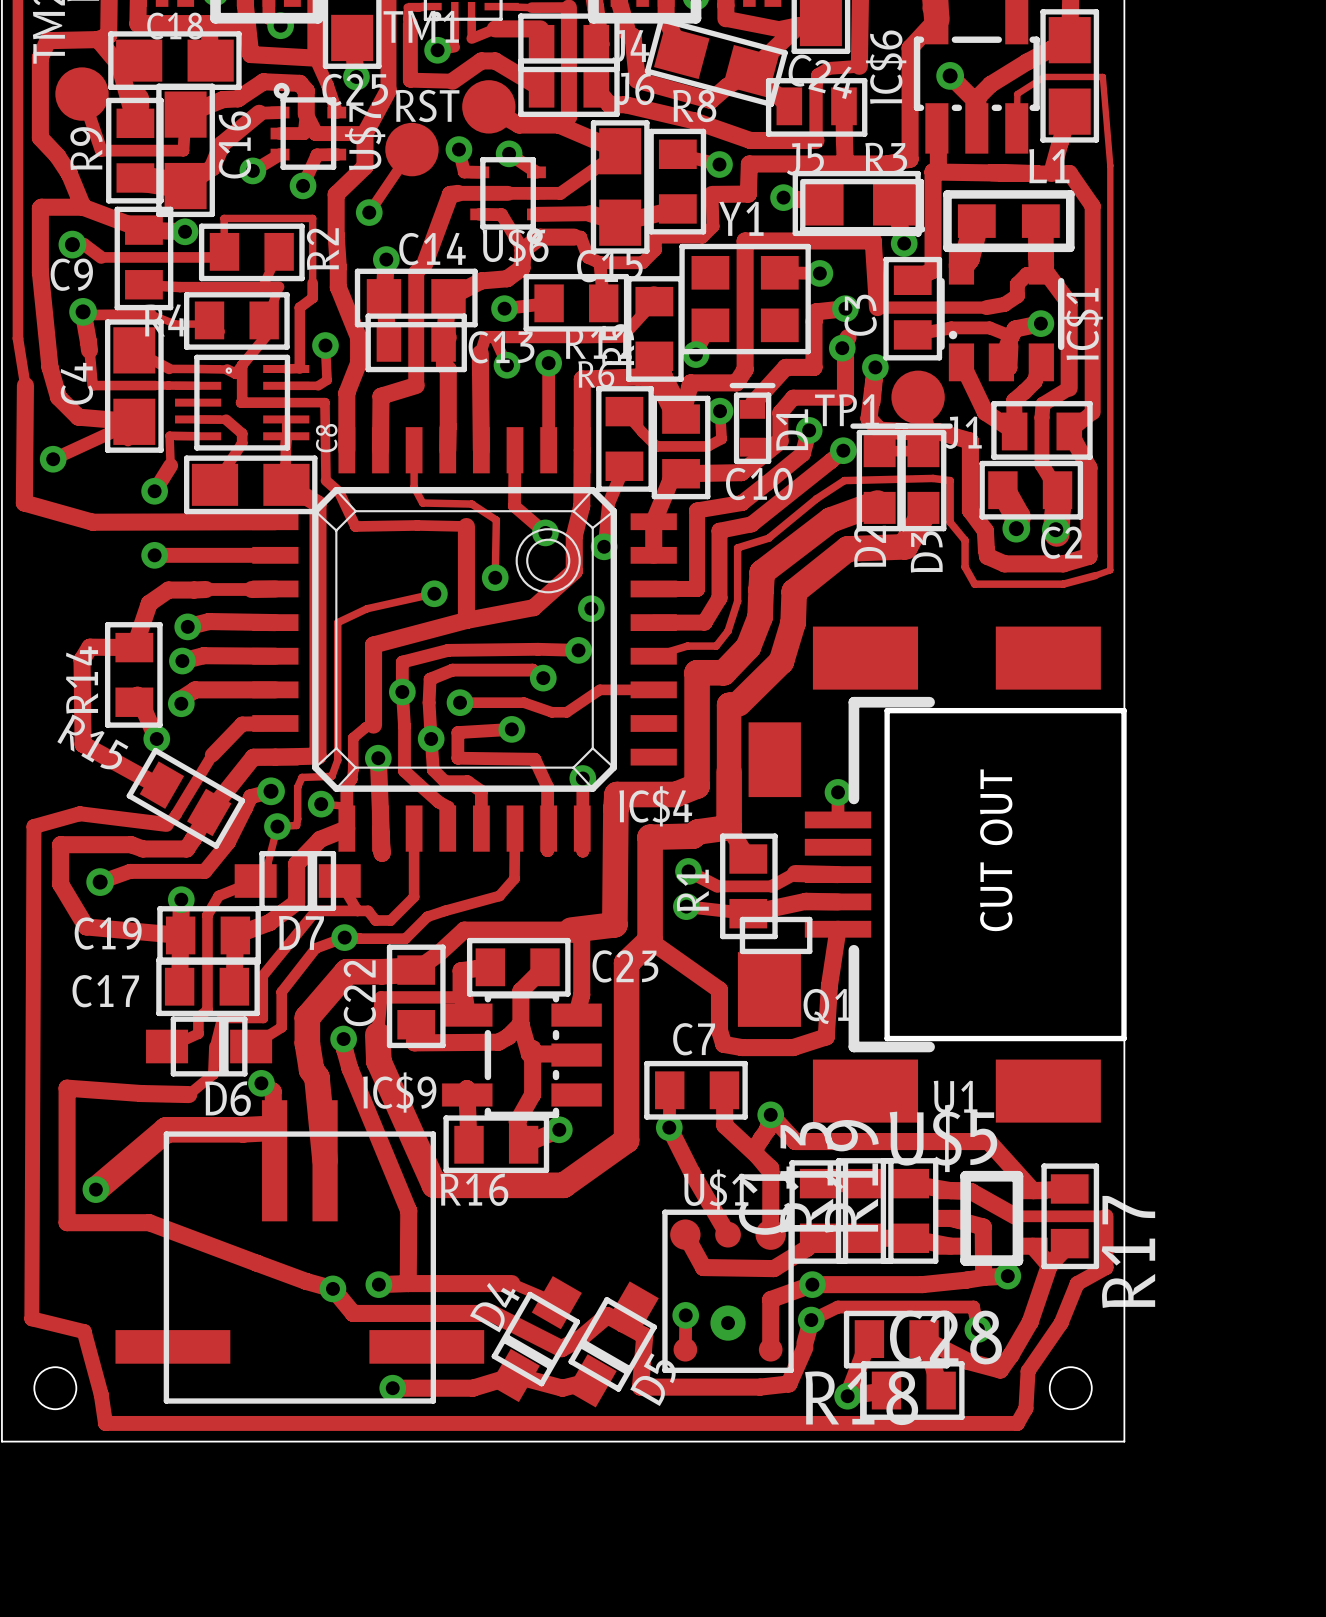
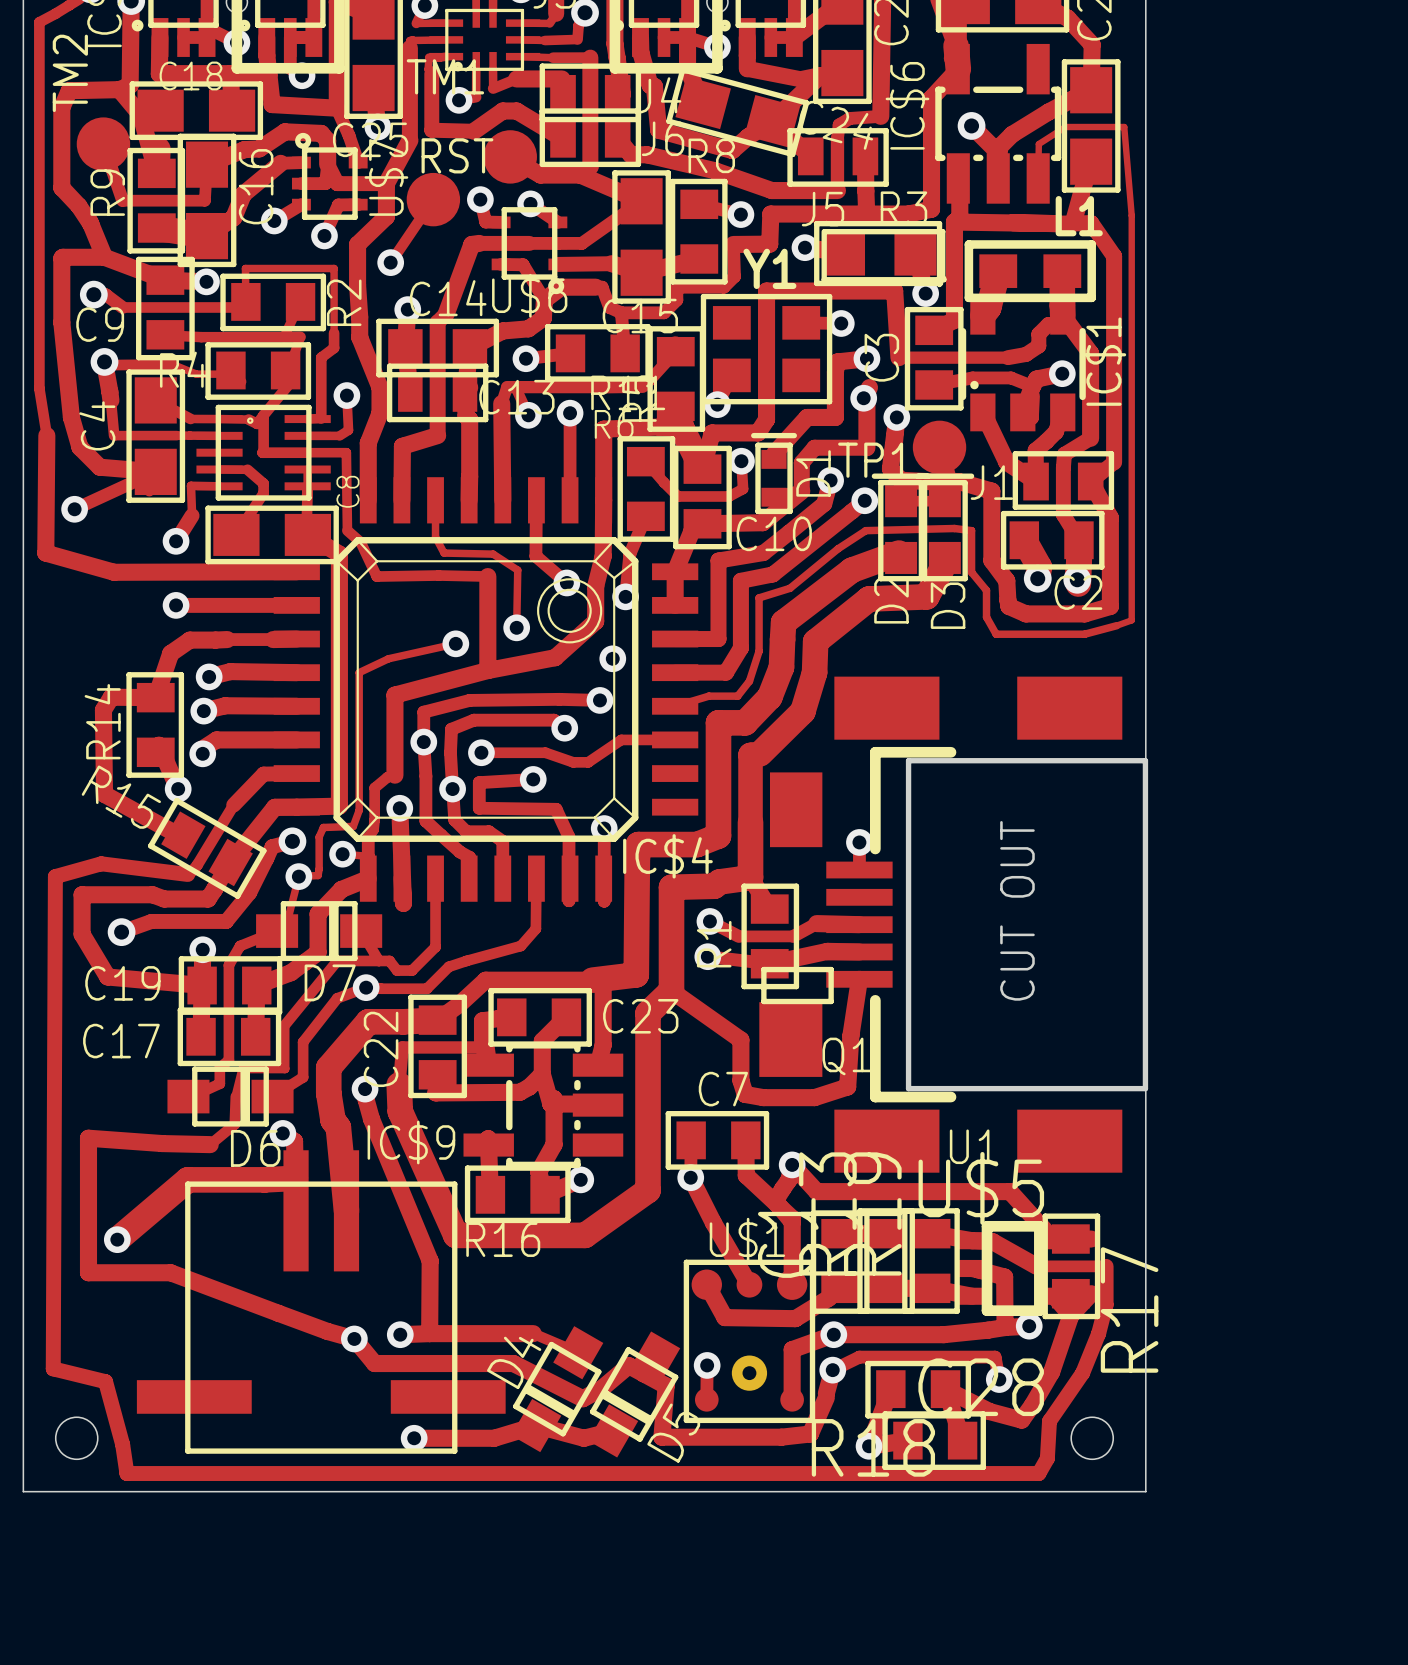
R17 position: (1070, 1216) -> (1071, 1266)
track: (1084, 1216) (1106, 1216) (1106, 1267) (1077, 1283) -> (1106, 1266) (1106, 1304) (1098, 1333)

